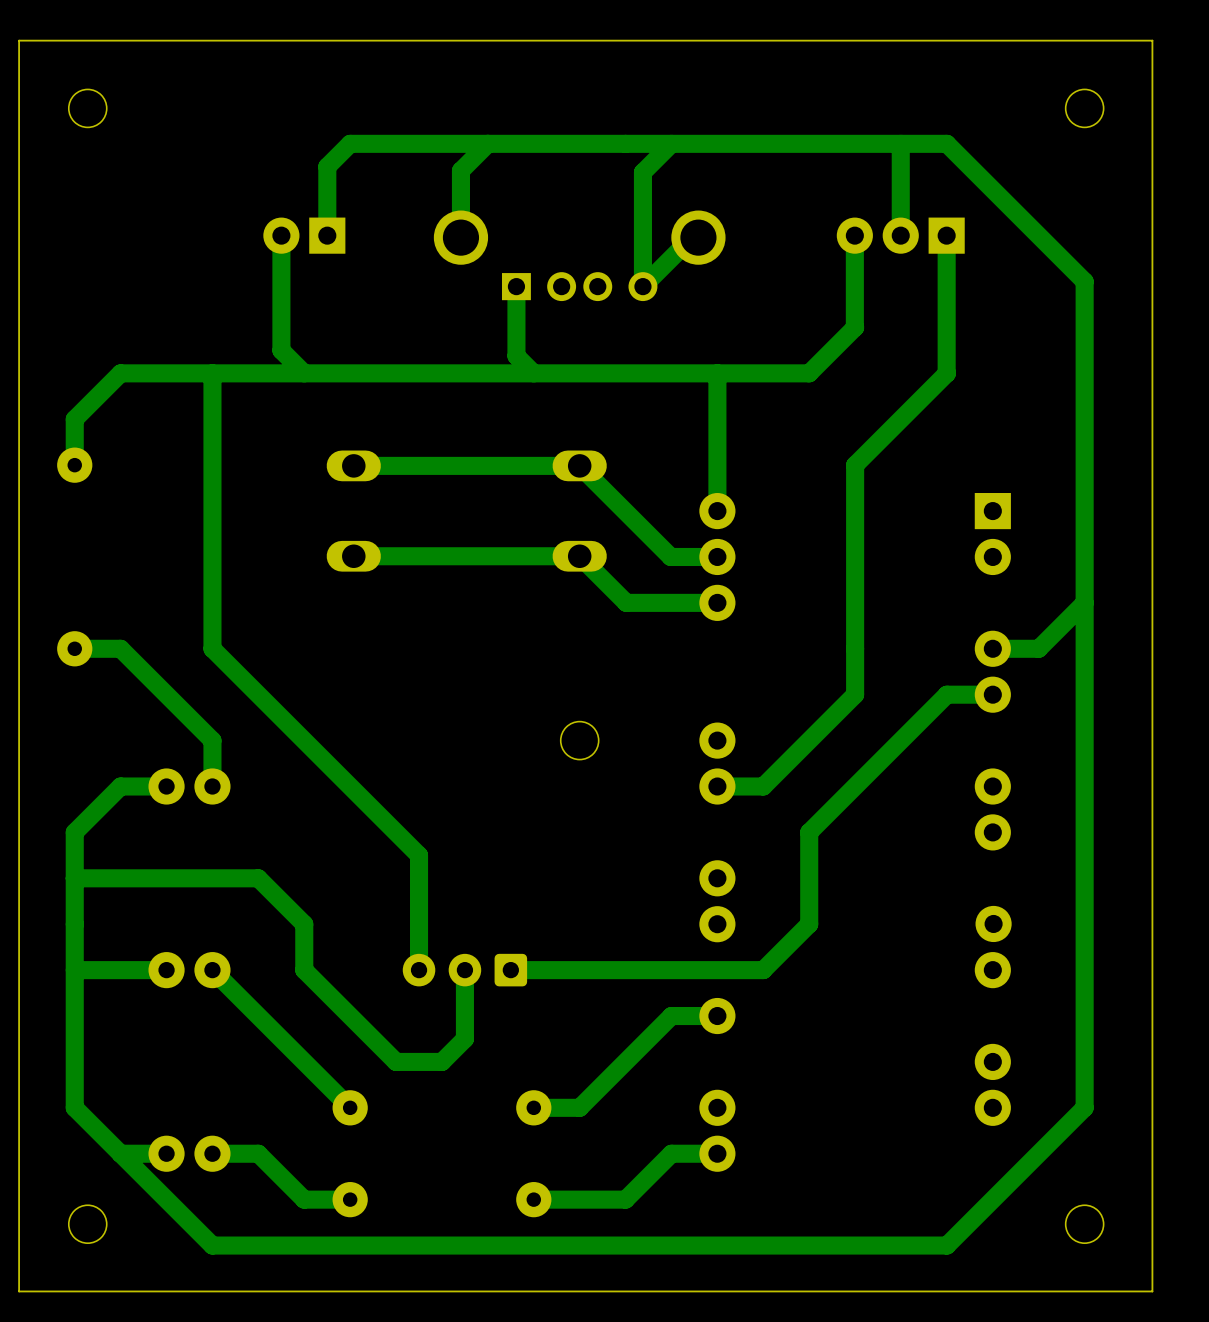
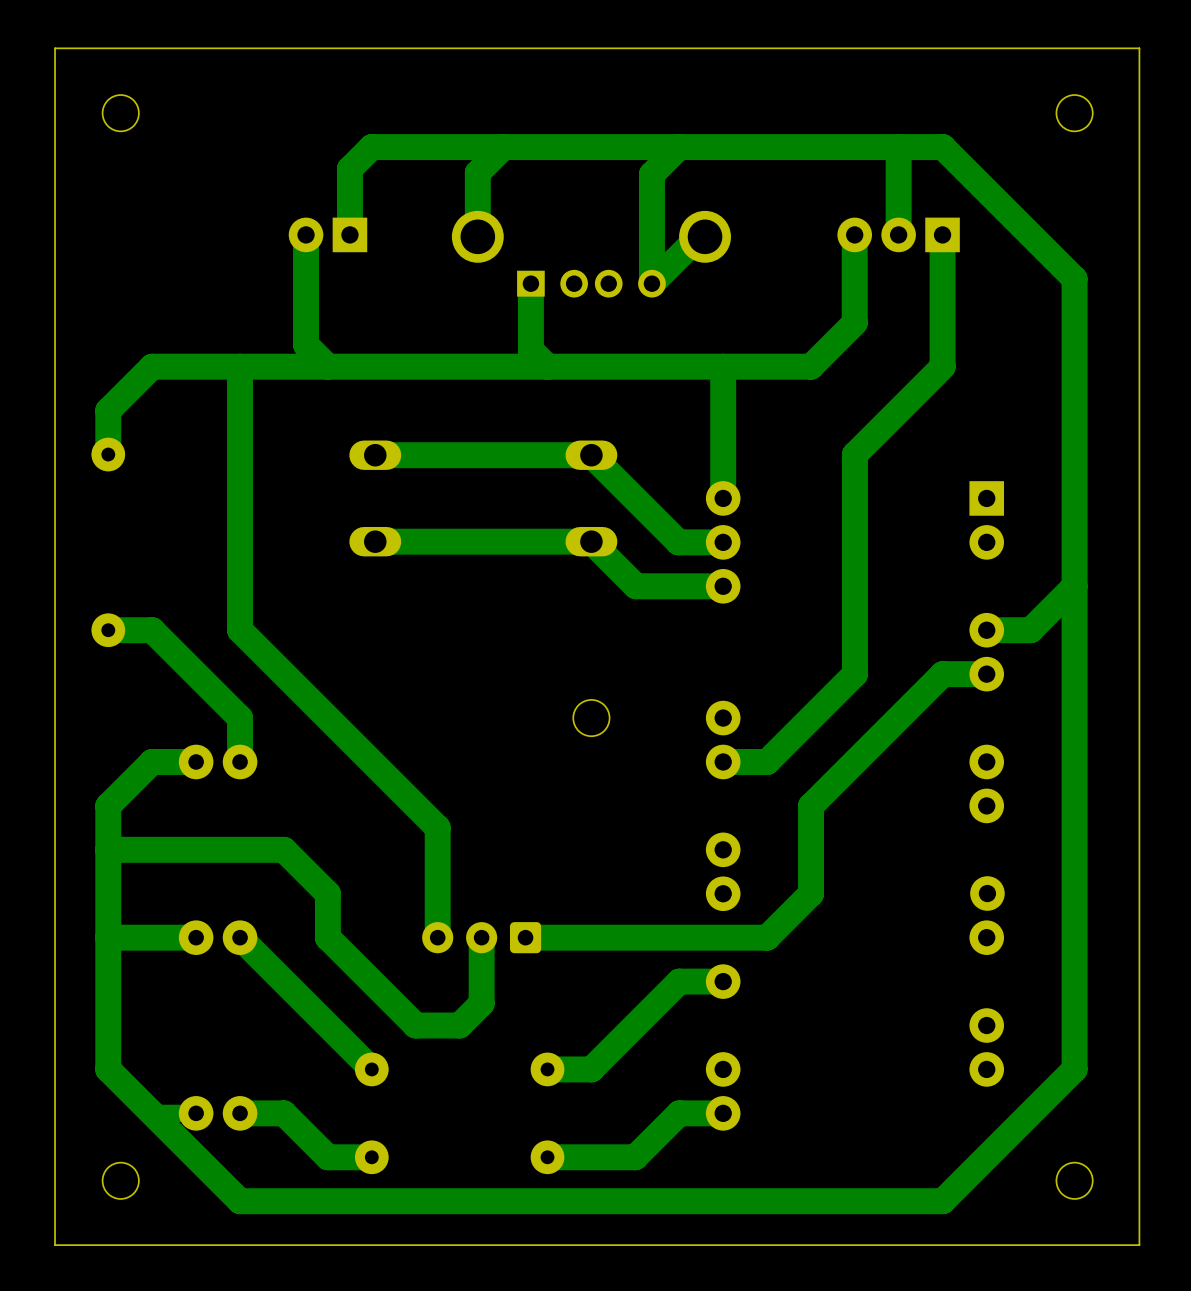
bottom track width: thin (487, 143) (460, 170) (460, 237) -> thick (503, 147) (477, 172) (477, 236)
bottom track width: thin (671, 143) (642, 172) (642, 286) (691, 237) -> thick (679, 147) (651, 174) (651, 283) (698, 236)
bottom track width: thin (900, 144) (900, 235) -> thick (898, 147) (898, 234)
bottom track width: thin (281, 235) (281, 350) (304, 373) -> thick (306, 234) (306, 344) (327, 366)
bottom track width: thin (327, 235) (327, 166) (350, 143) (946, 143) (1084, 281) (1084, 1107) (946, 1245) (212, 1245) (74, 1107) (74, 832) (120, 786) (166, 786) -> thick (349, 234) (349, 168) (371, 147) (942, 147) (1074, 278) (1074, 1069) (942, 1201) (240, 1201) (108, 1069) (108, 805) (152, 761) (196, 761)
bottom track width: thin (854, 235) (854, 327) -> thick (854, 234) (854, 322)
bottom track width: thin (946, 235) (946, 373) -> thick (942, 234) (942, 366)
bottom track width: thin (516, 286) (516, 356) (533, 373) -> thick (530, 283) (530, 350) (547, 366)
bottom track width: thin (855, 327) (809, 373) (120, 373) (74, 419) (74, 465) -> thick (854, 322) (811, 366) (152, 366) (108, 410) (108, 454)
bottom track width: thin (212, 373) (212, 648) (419, 855) (419, 970) -> thick (240, 366) (240, 630) (437, 827) (437, 937)
bottom track width: thin (717, 373) (717, 511) -> thick (723, 366) (723, 498)
bottom track width: thin (946, 373) (855, 465) (855, 694) (763, 786) (717, 786) -> thick (942, 366) (854, 454) (854, 674) (767, 761) (723, 761)
bottom track width: thin (353, 465) (579, 465) (670, 556) (717, 556) -> thick (375, 455) (591, 455) (678, 542) (723, 542)
bottom track width: thin (353, 556) (579, 556) (626, 602) (717, 602) -> thick (375, 541) (591, 541) (636, 586) (723, 586)
bottom track width: thin (1084, 602) (1038, 648) (992, 648) -> thick (1074, 586) (1030, 630) (986, 630)
bottom track width: thin (74, 648) (120, 648) (212, 740) (212, 786) -> thick (108, 630) (152, 630) (240, 718) (240, 761)
bottom track width: thin (992, 694) (946, 694) (809, 832) (809, 924) (763, 970) (510, 970) -> thick (986, 674) (942, 674) (811, 805) (811, 893) (767, 937) (525, 937)
bottom track width: thin (74, 878) (258, 878) (304, 924) (304, 970) (396, 1061) (441, 1061) (464, 1038) (464, 970) -> thick (108, 849) (283, 849) (327, 893) (327, 937) (415, 1025) (459, 1025) (481, 1003) (481, 937)
bottom track width: thin (166, 970) (74, 970) -> thick (196, 937) (108, 937)
bottom track width: thin (212, 970) (350, 1107) -> thick (240, 937) (371, 1069)
bottom track width: thin (717, 1016) (671, 1016) (579, 1107) (533, 1107) -> thick (723, 981) (679, 981) (591, 1069) (547, 1069)
bottom track width: thin (212, 1153) (258, 1153) (304, 1199) (350, 1199) -> thick (240, 1113) (283, 1113) (327, 1157) (371, 1157)
bottom track width: thin (717, 1153) (671, 1153) (625, 1199) (533, 1199) -> thick (723, 1113) (679, 1113) (635, 1157) (547, 1157)

